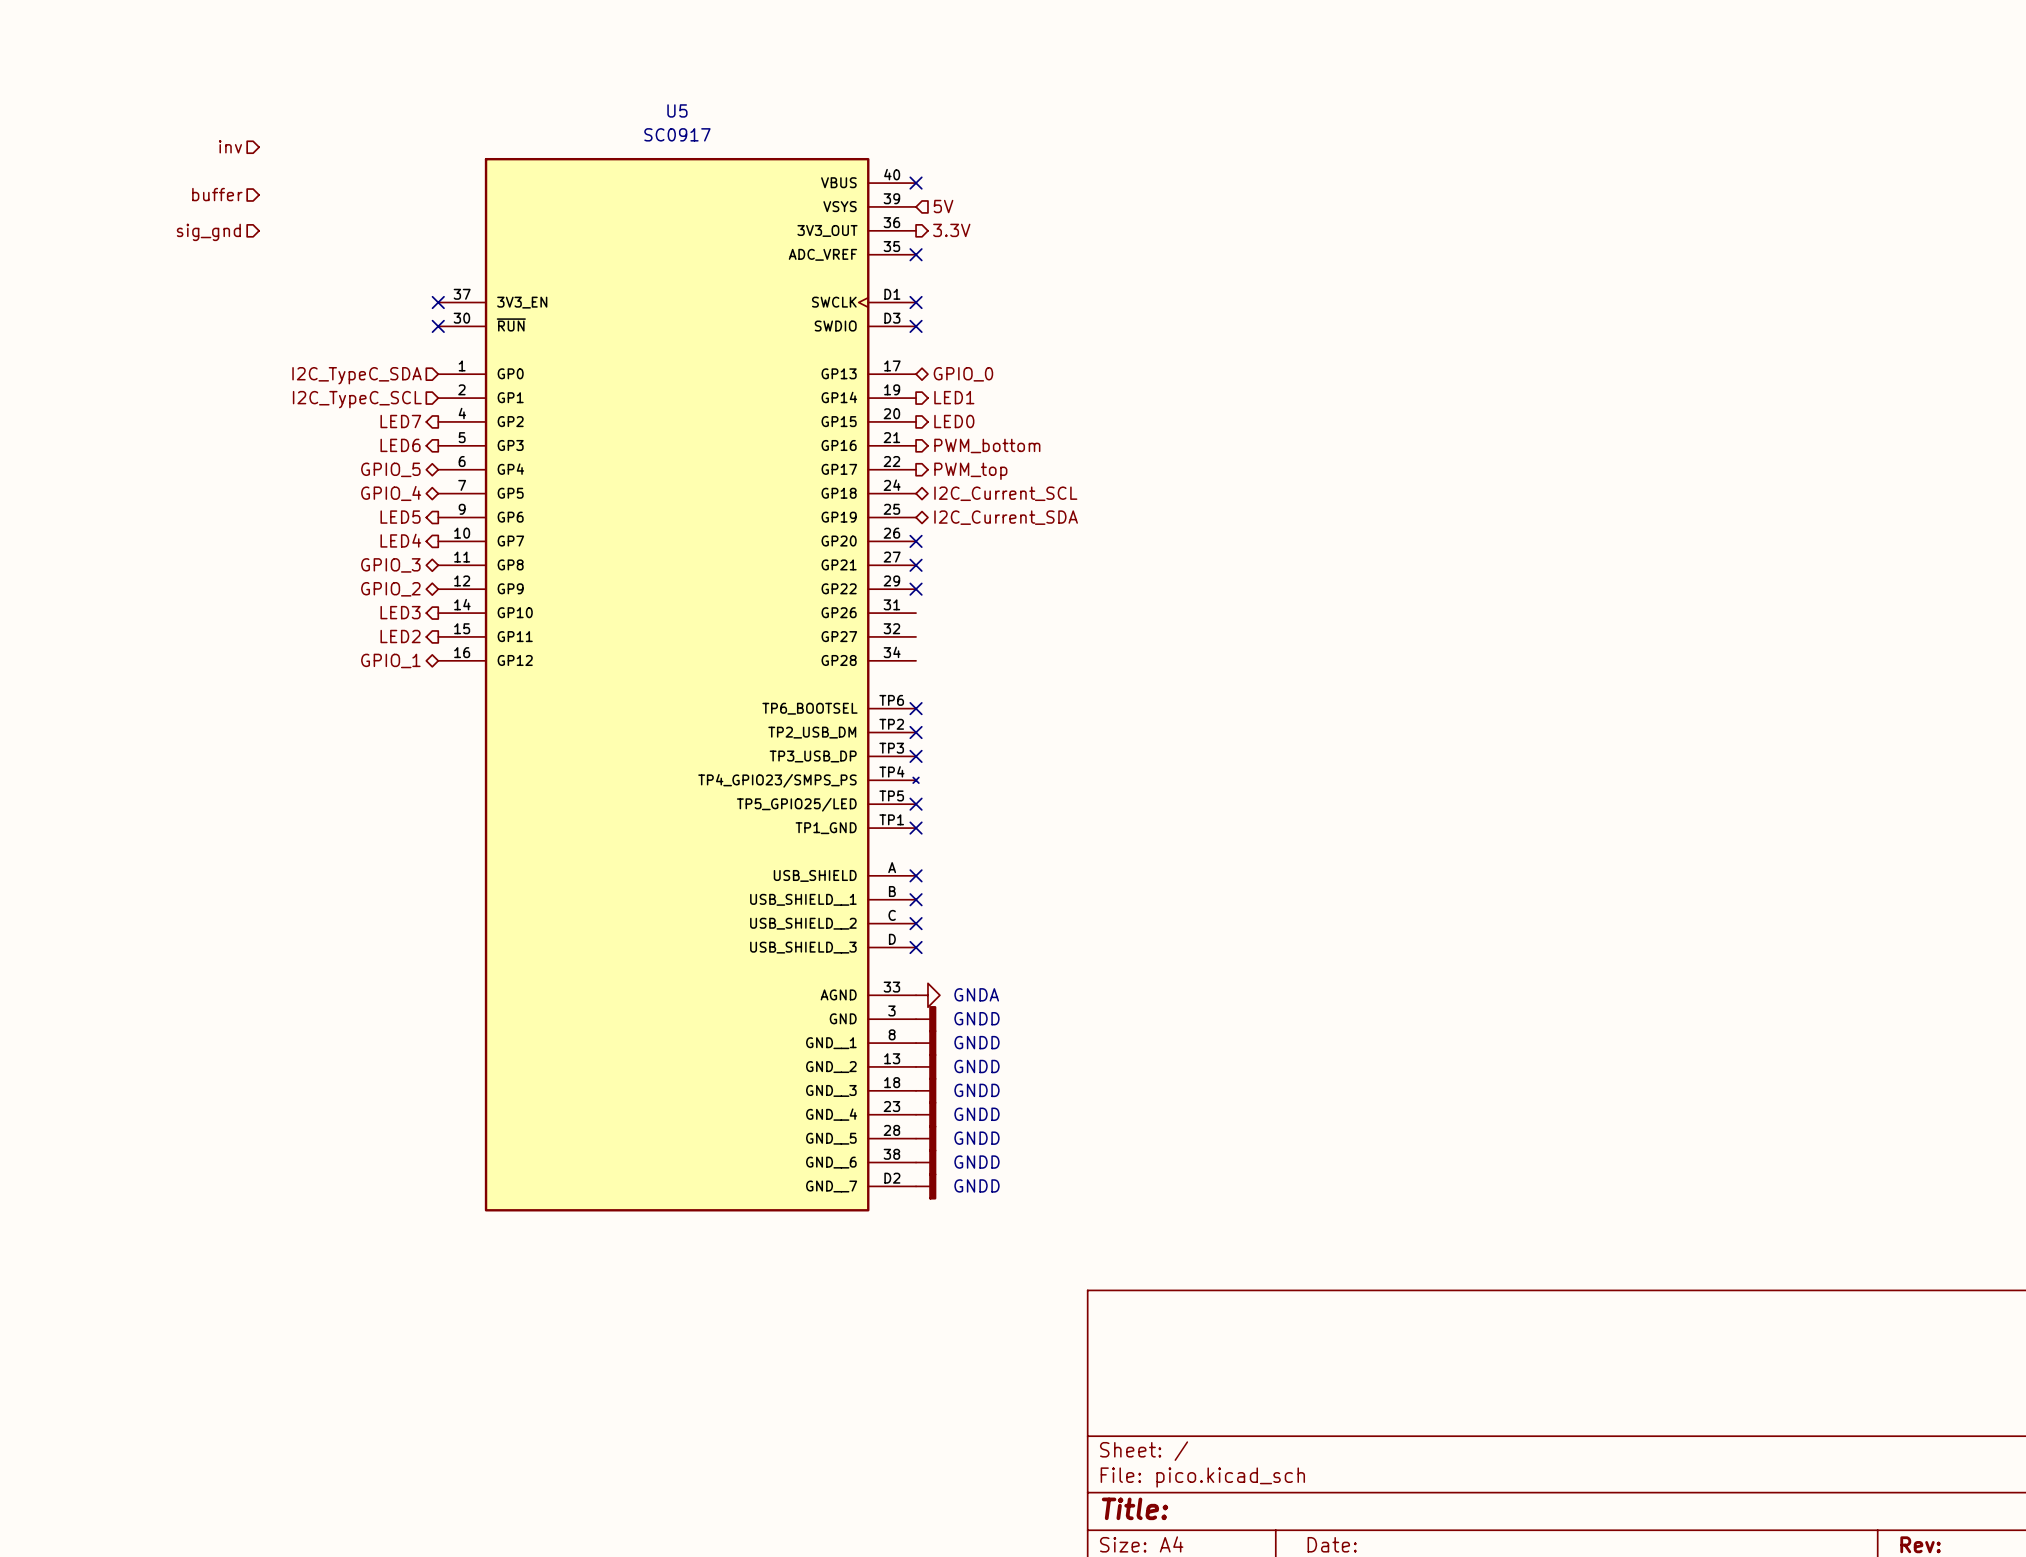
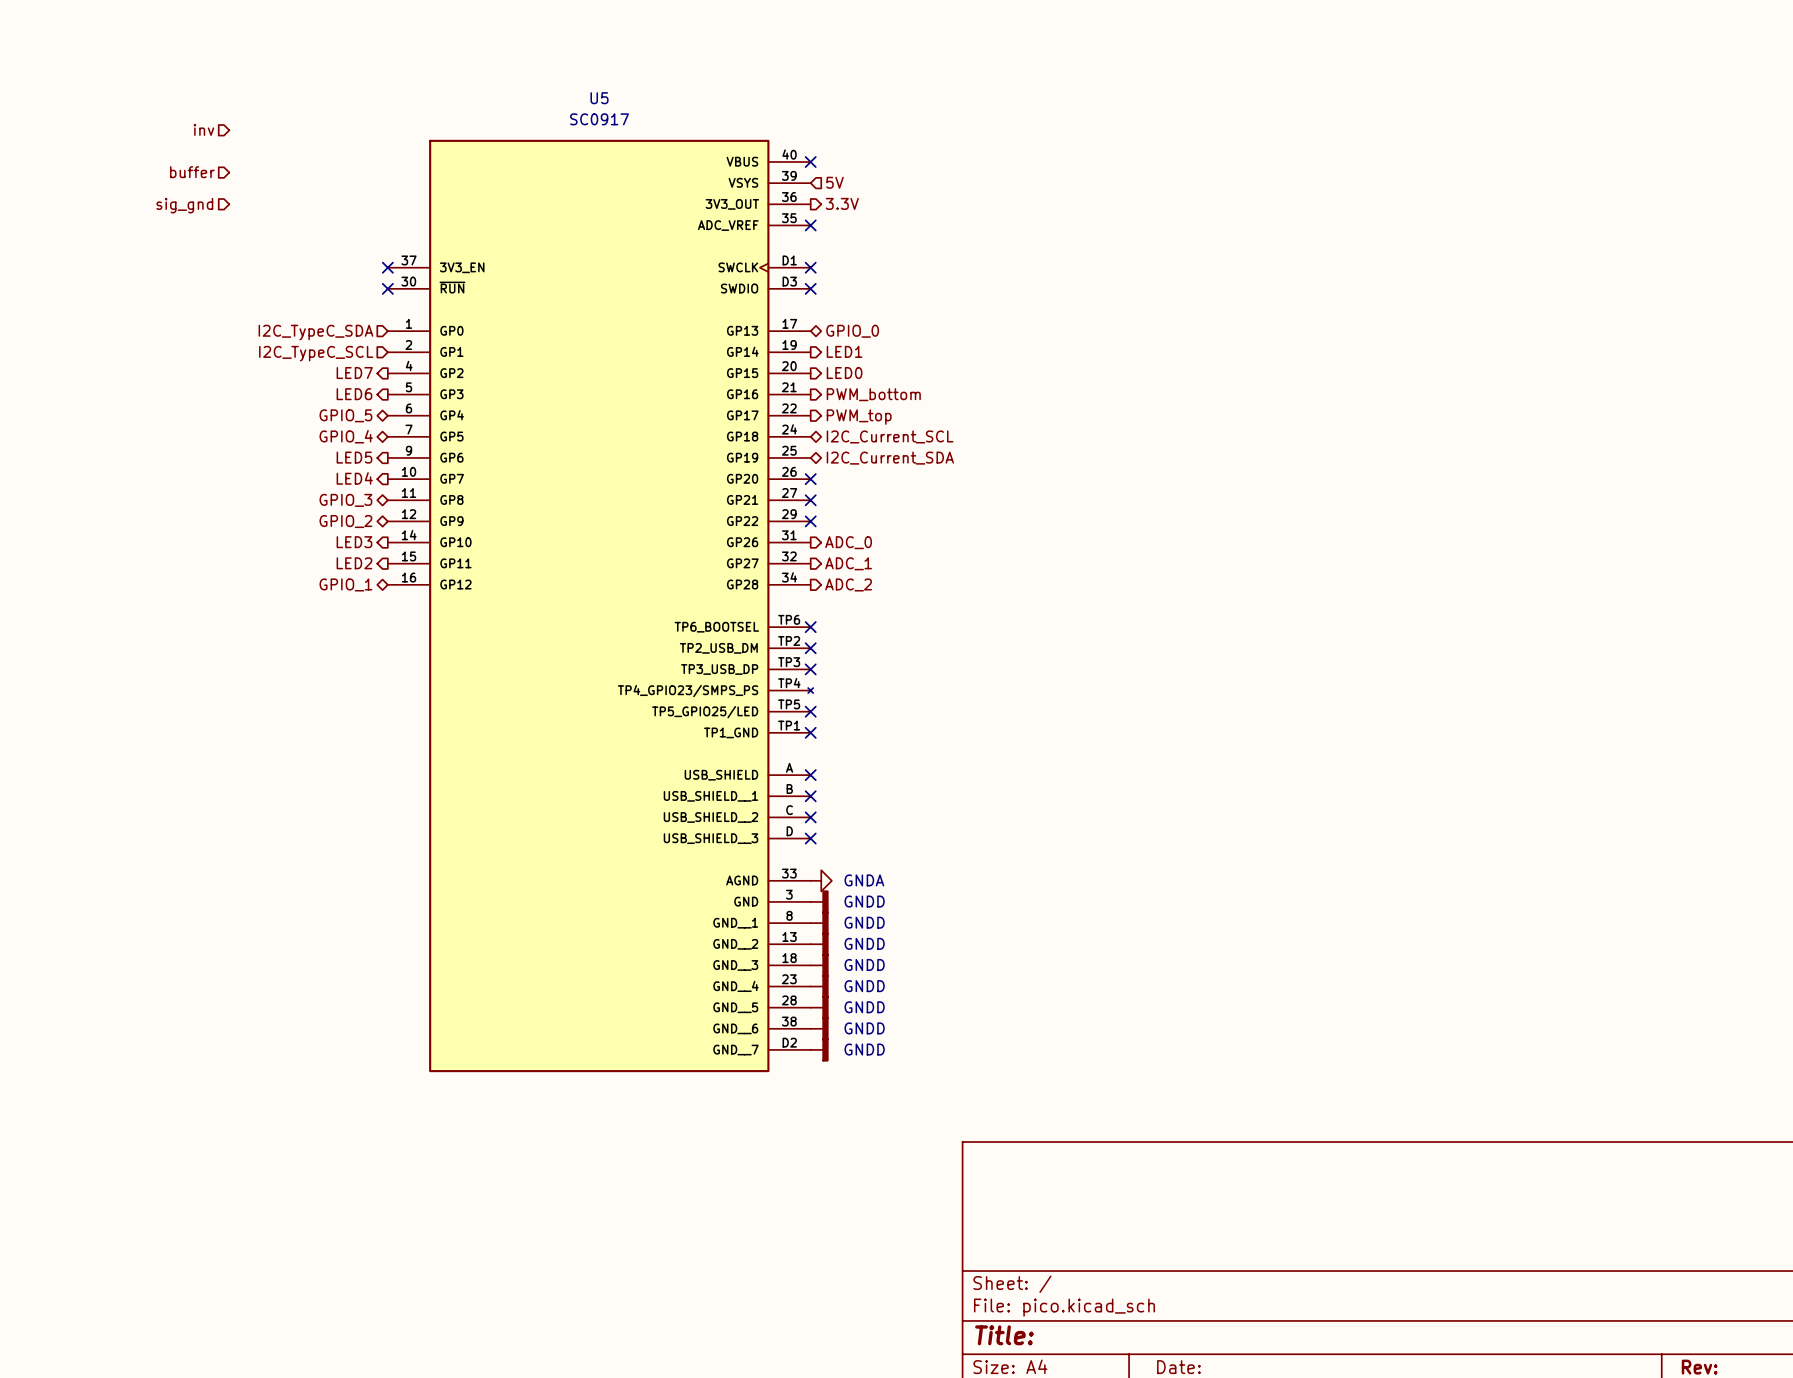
hierarchical label: none -> ADC_0 (848, 542)
hierarchical label: none -> ADC_1 (848, 563)
hierarchical label: none -> ADC_2 (848, 584)

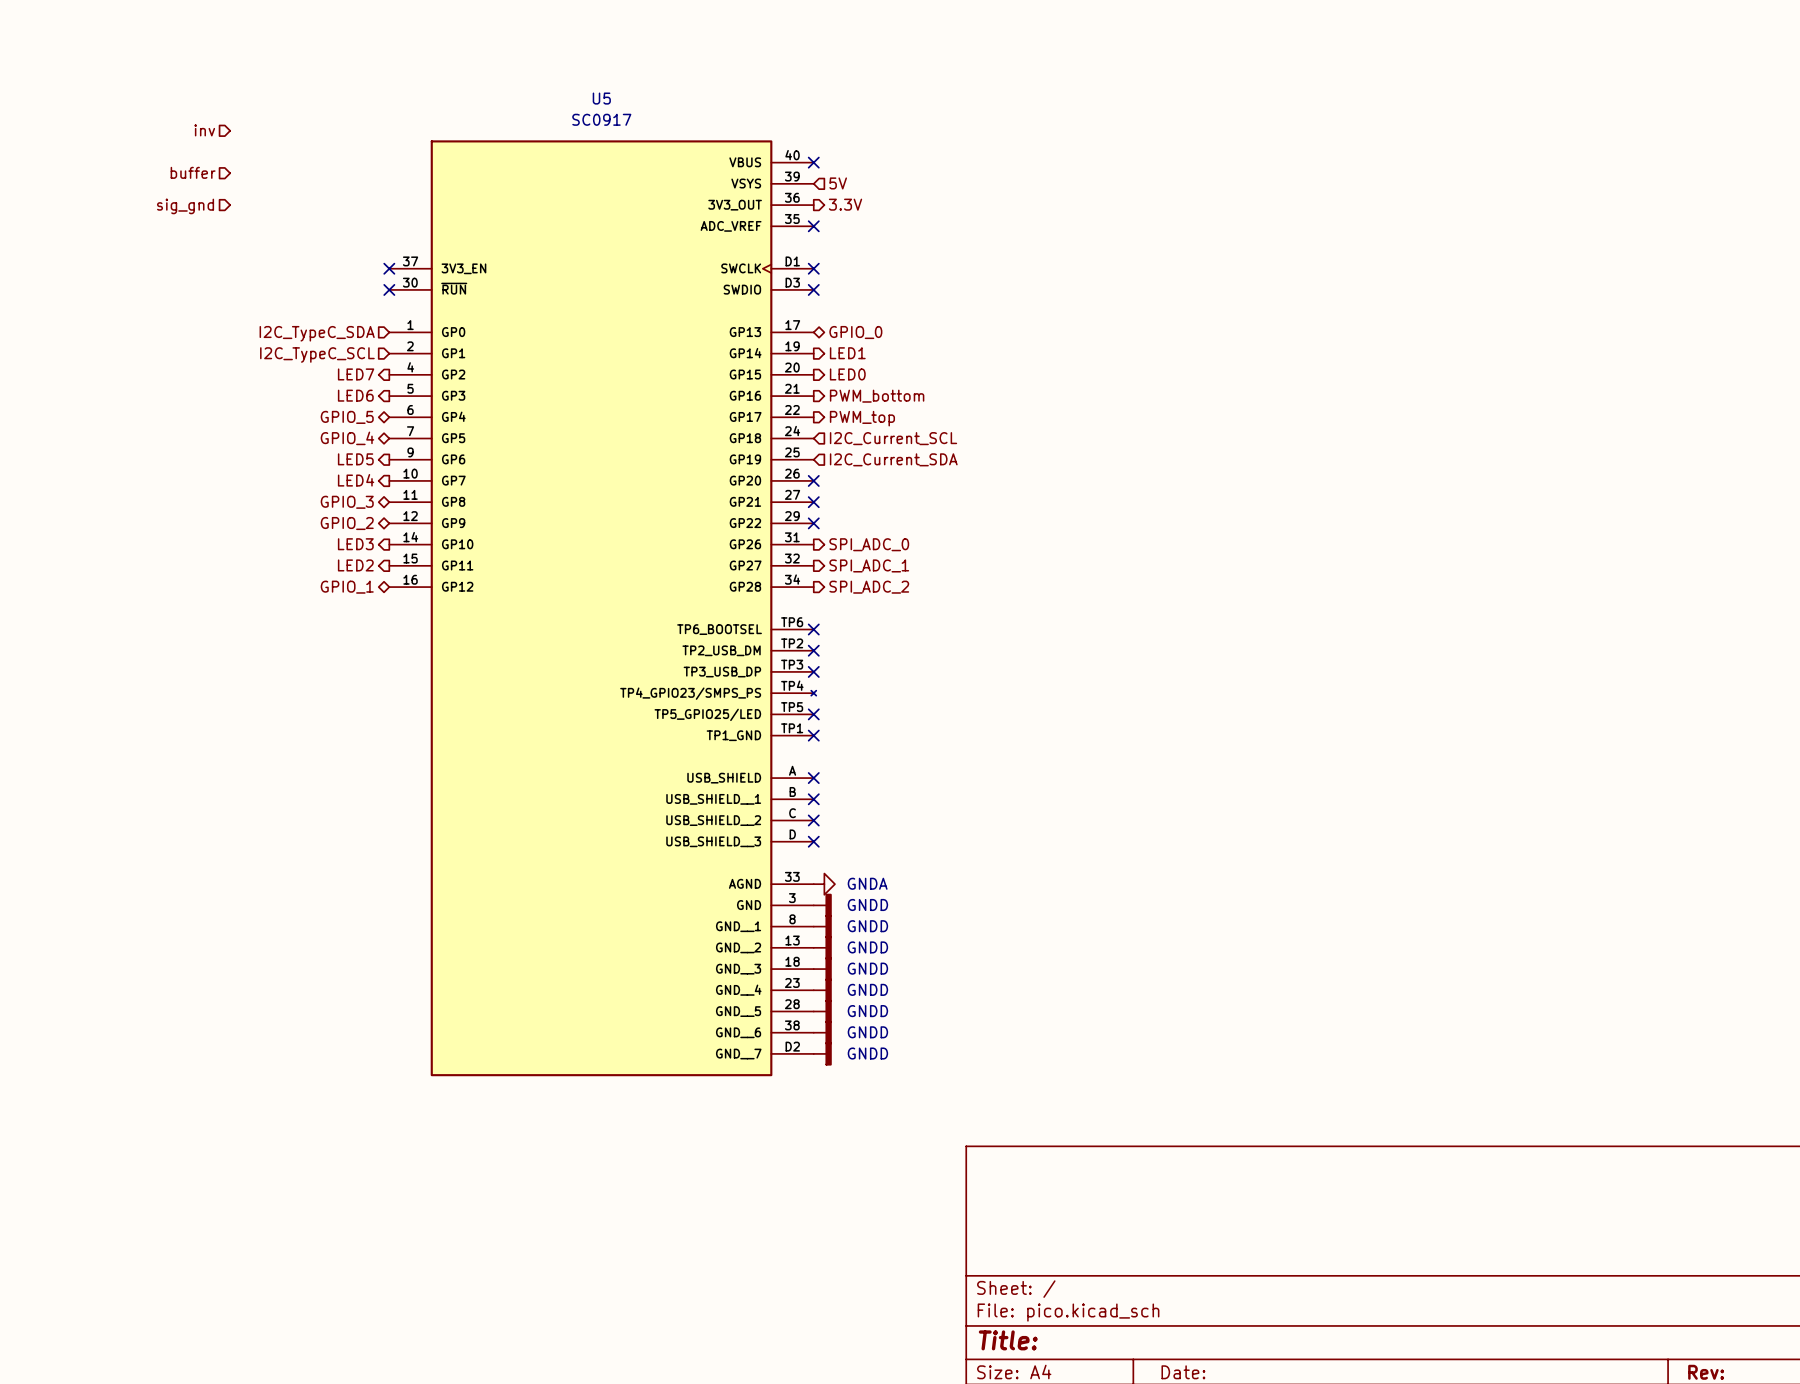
hierarchical label shape: bidirectional (890, 436) -> input (893, 438)
hierarchical label shape: bidirectional (890, 458) -> input (893, 459)
hierarchical label: ADC_0 (848, 542) -> SPI_ADC_0 (869, 544)
hierarchical label: ADC_1 (848, 563) -> SPI_ADC_1 (869, 565)
hierarchical label: ADC_2 (848, 584) -> SPI_ADC_2 (869, 587)

